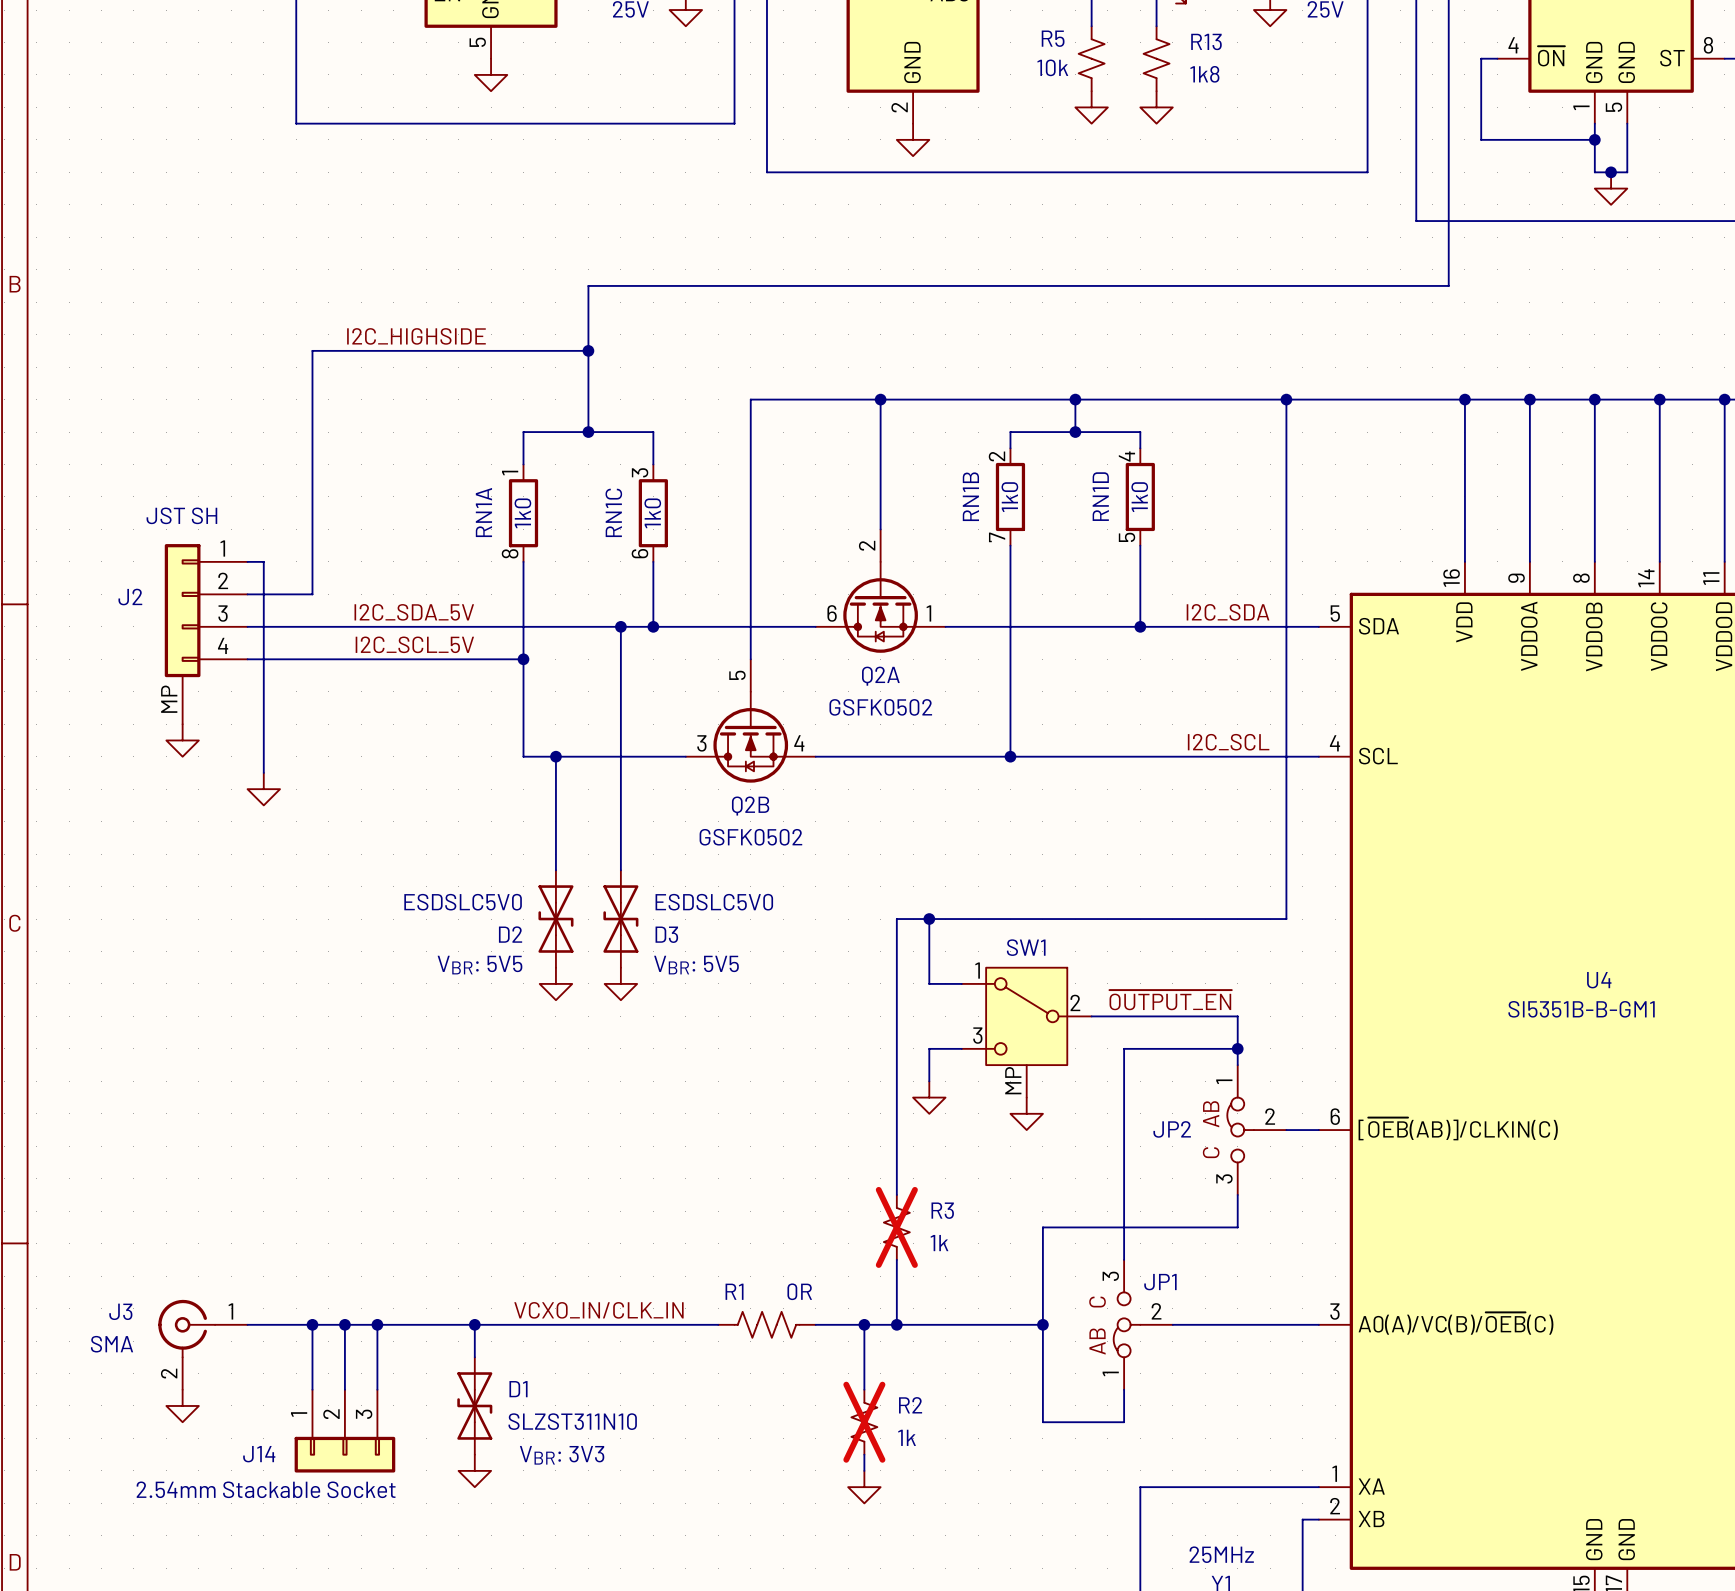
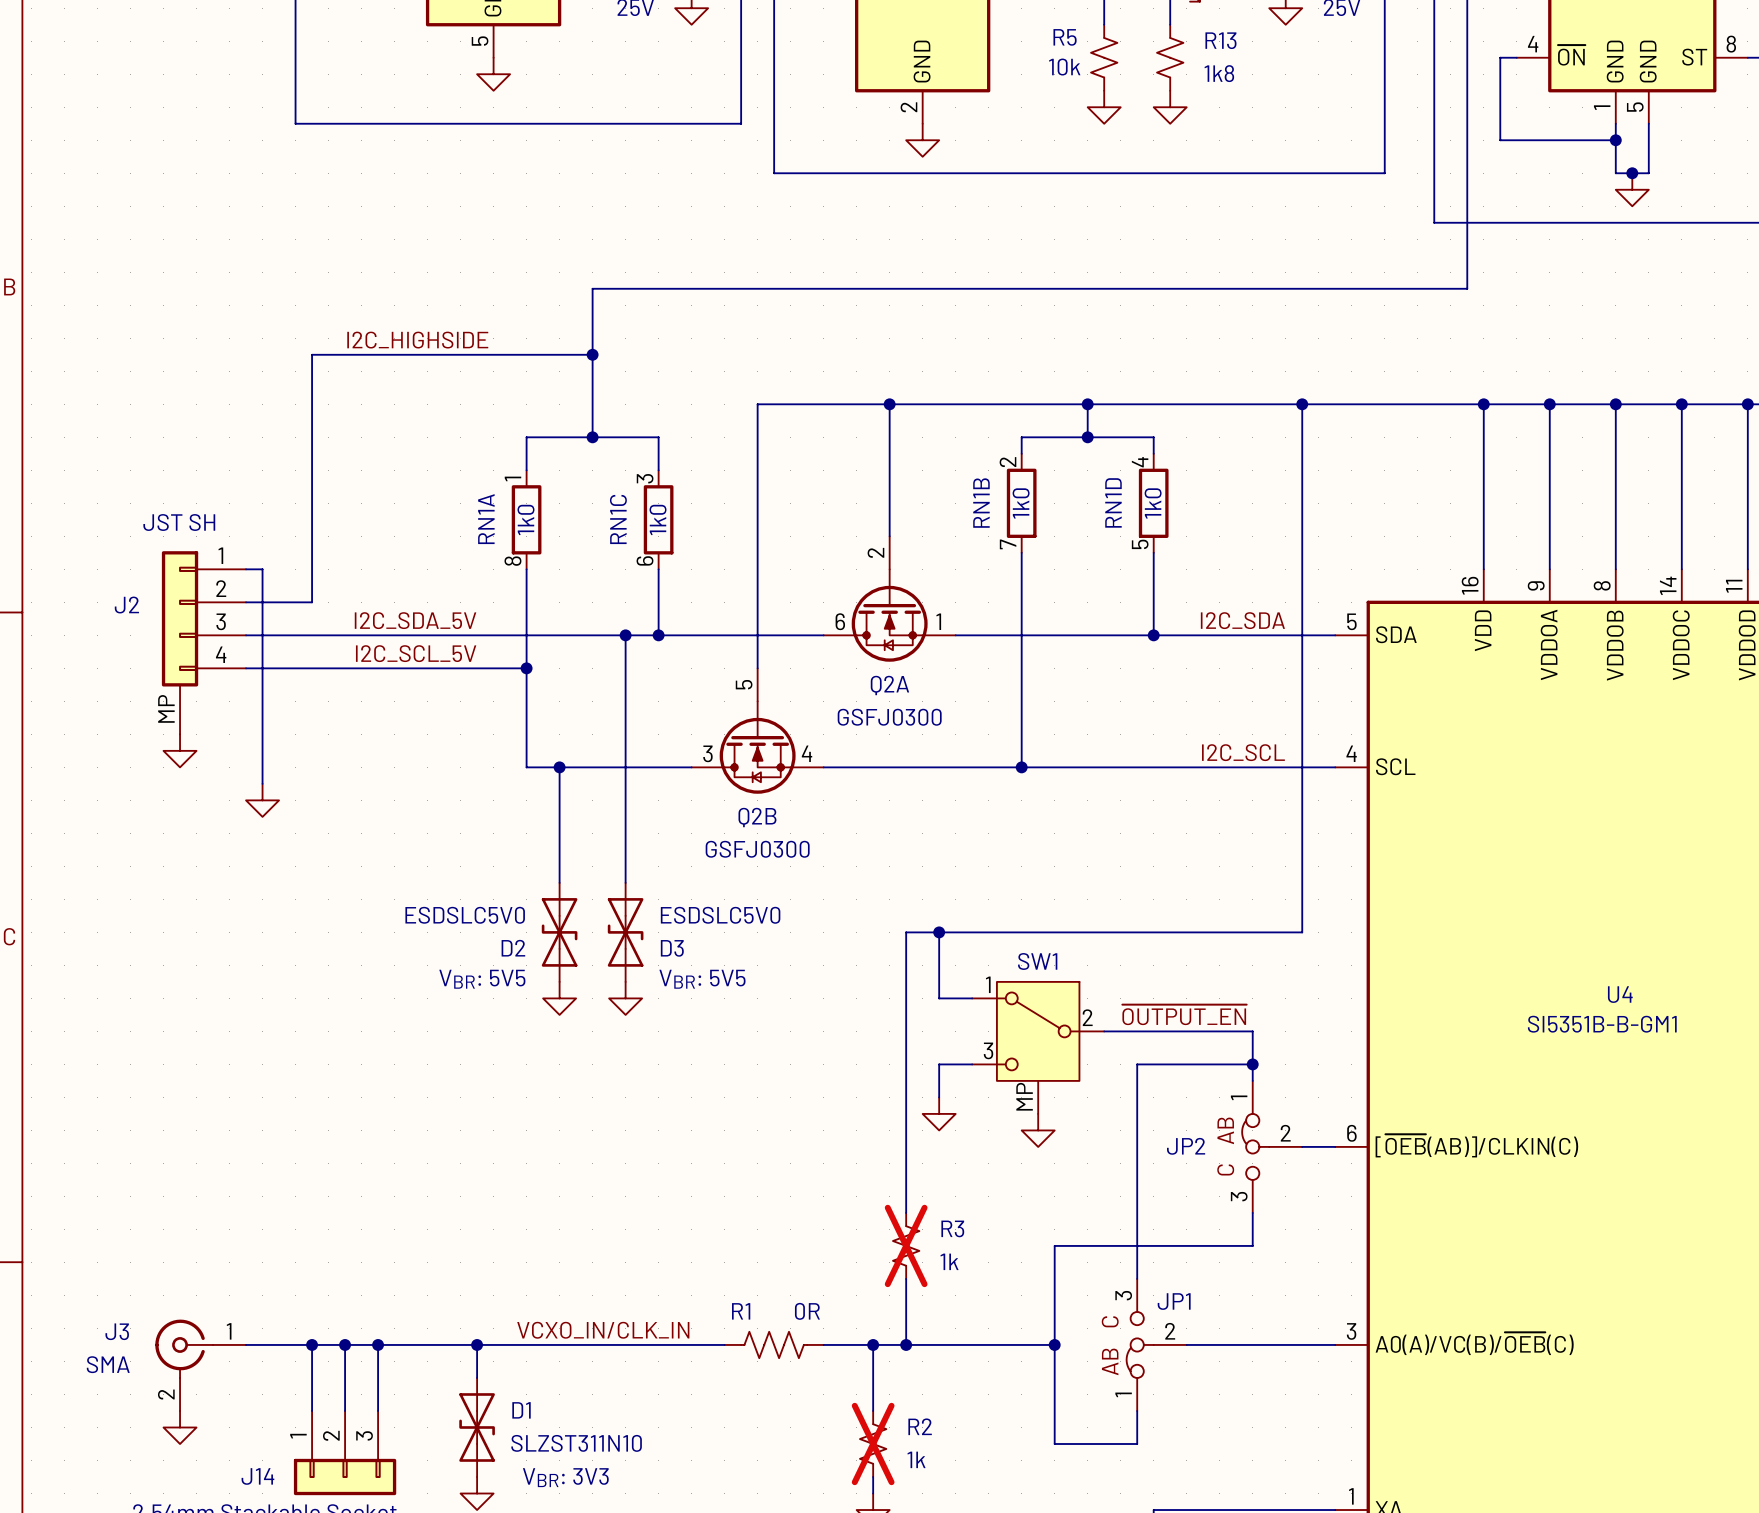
Q2A value: GSFK0502 (880, 707) -> GSFJ0300 (889, 717)
Q2B value: GSFK0502 (750, 837) -> GSFJ0300 (757, 849)

